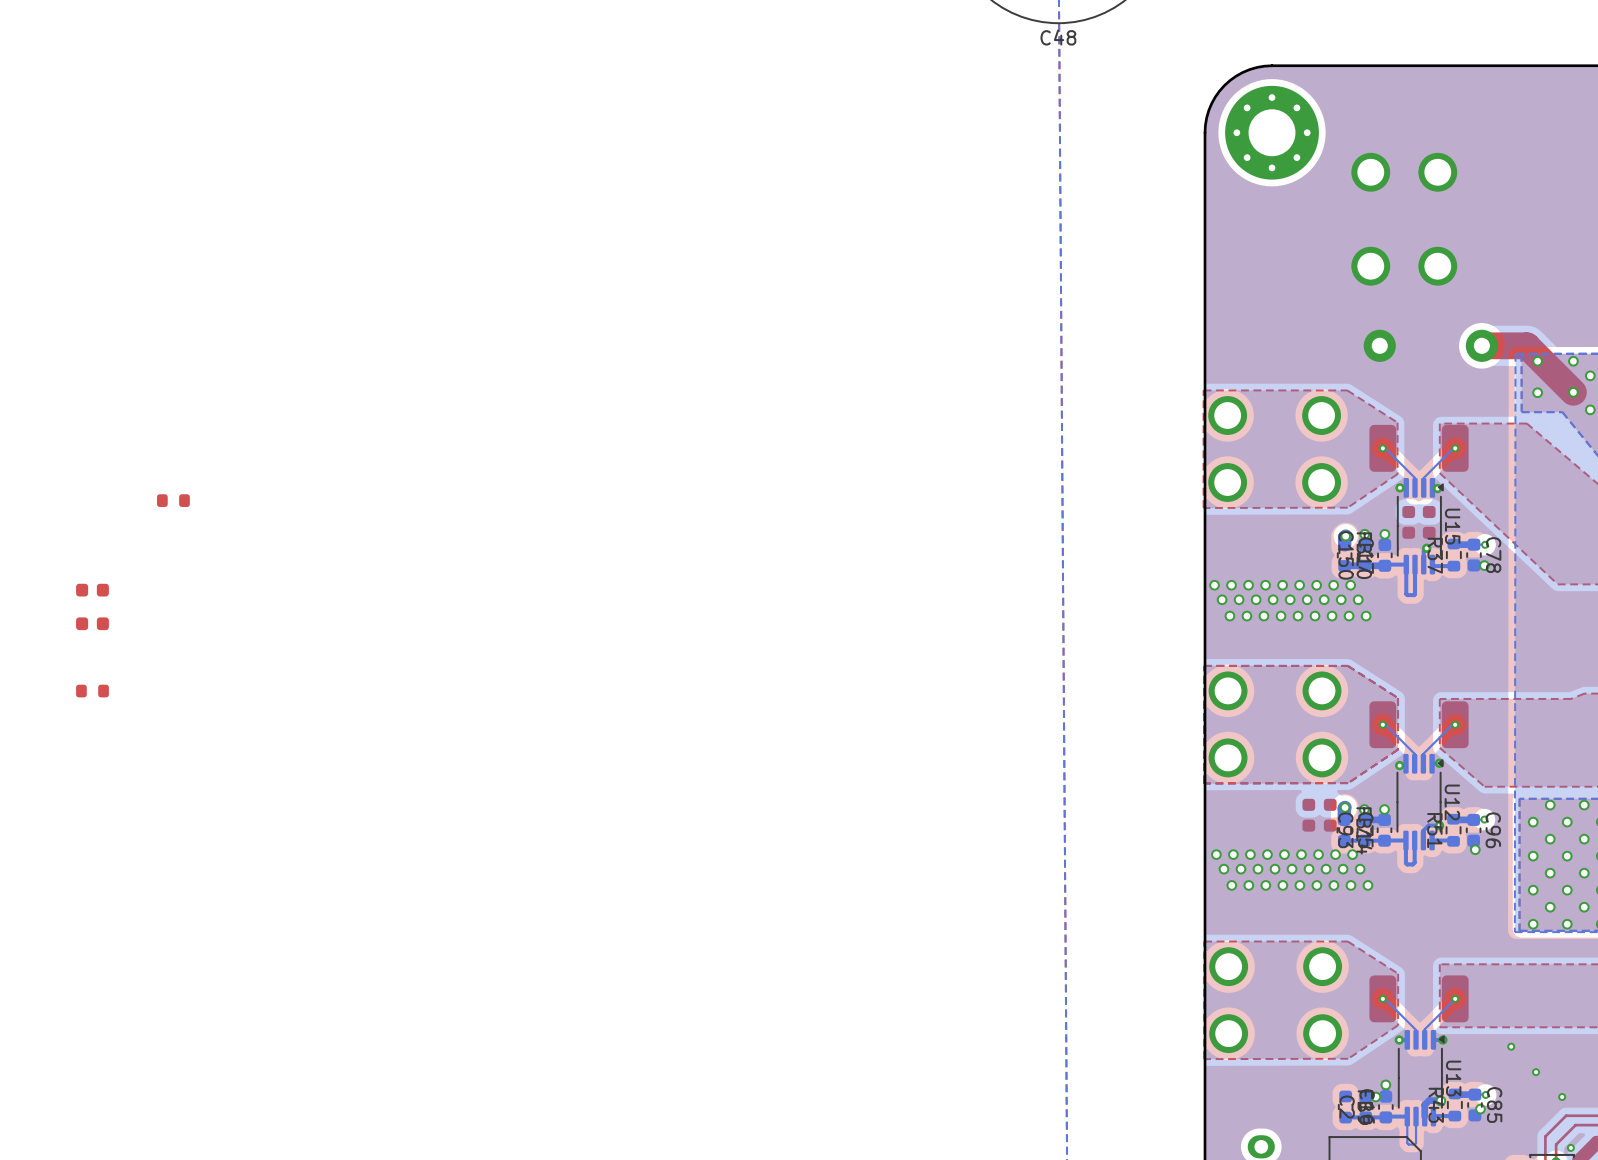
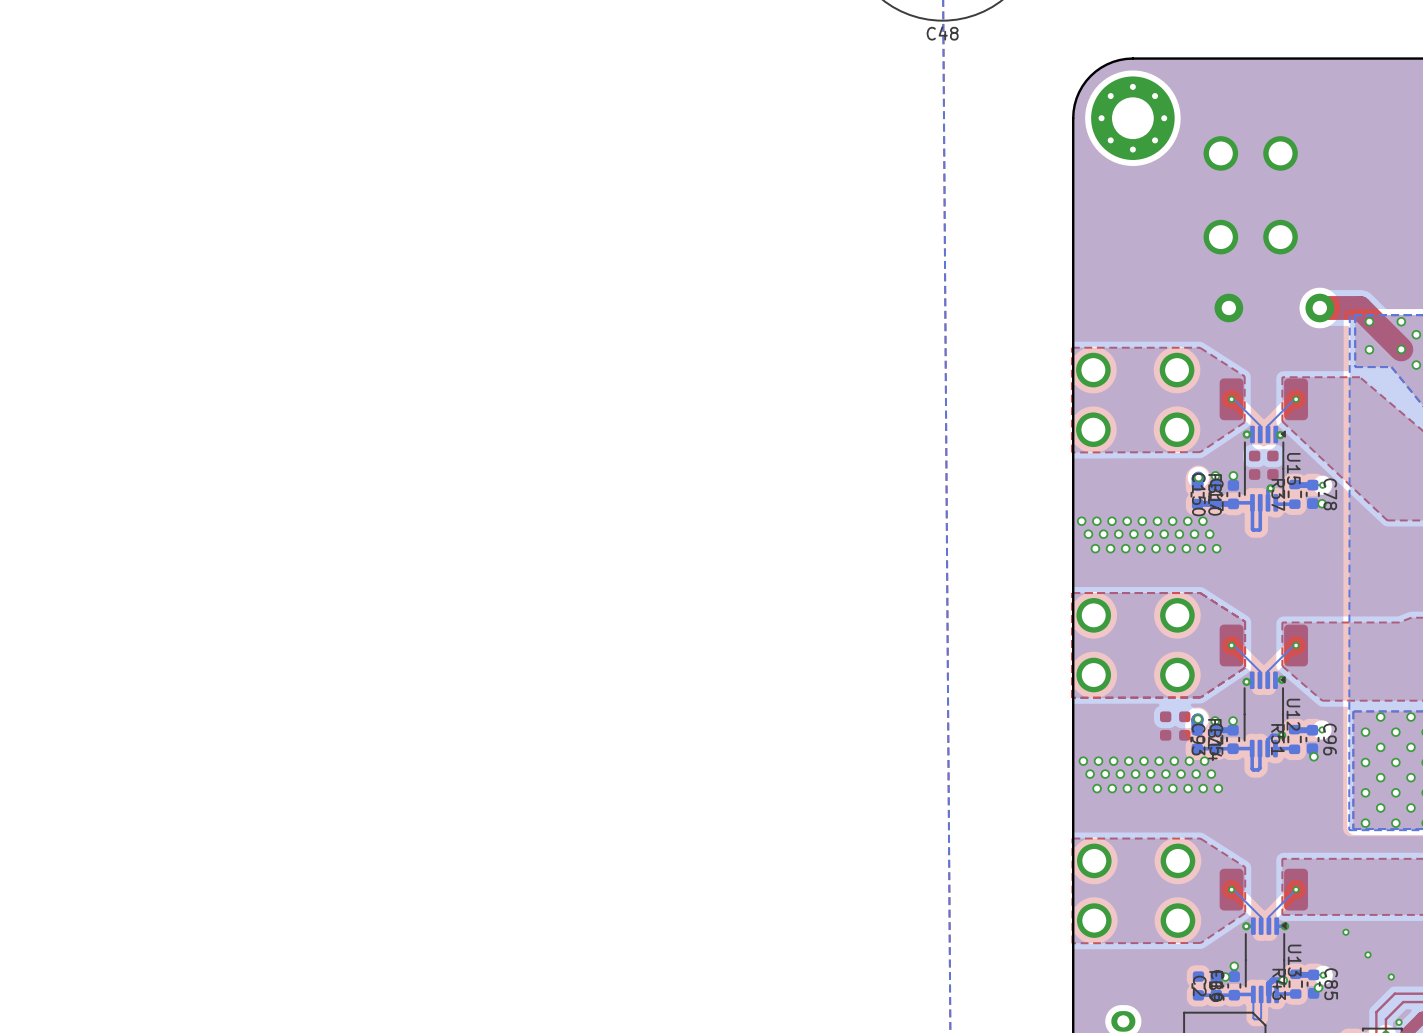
part: (173, 500) -> none
part: (92, 590) -> none
part: (92, 623) -> none
part: (92, 691) -> none

